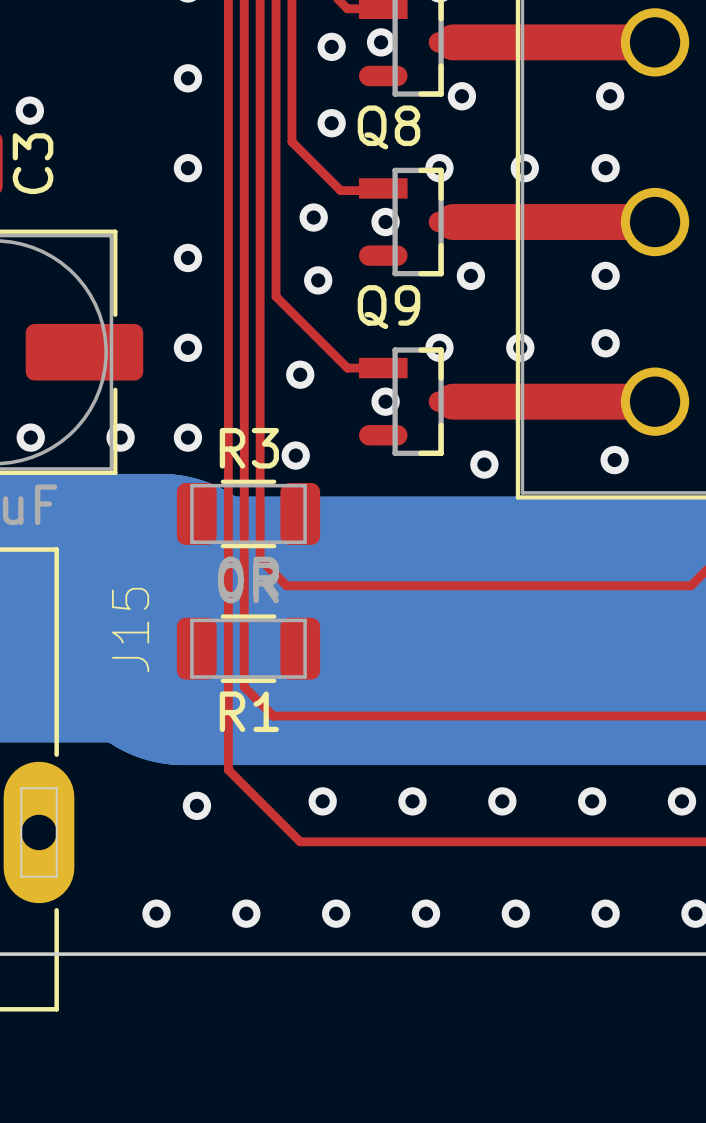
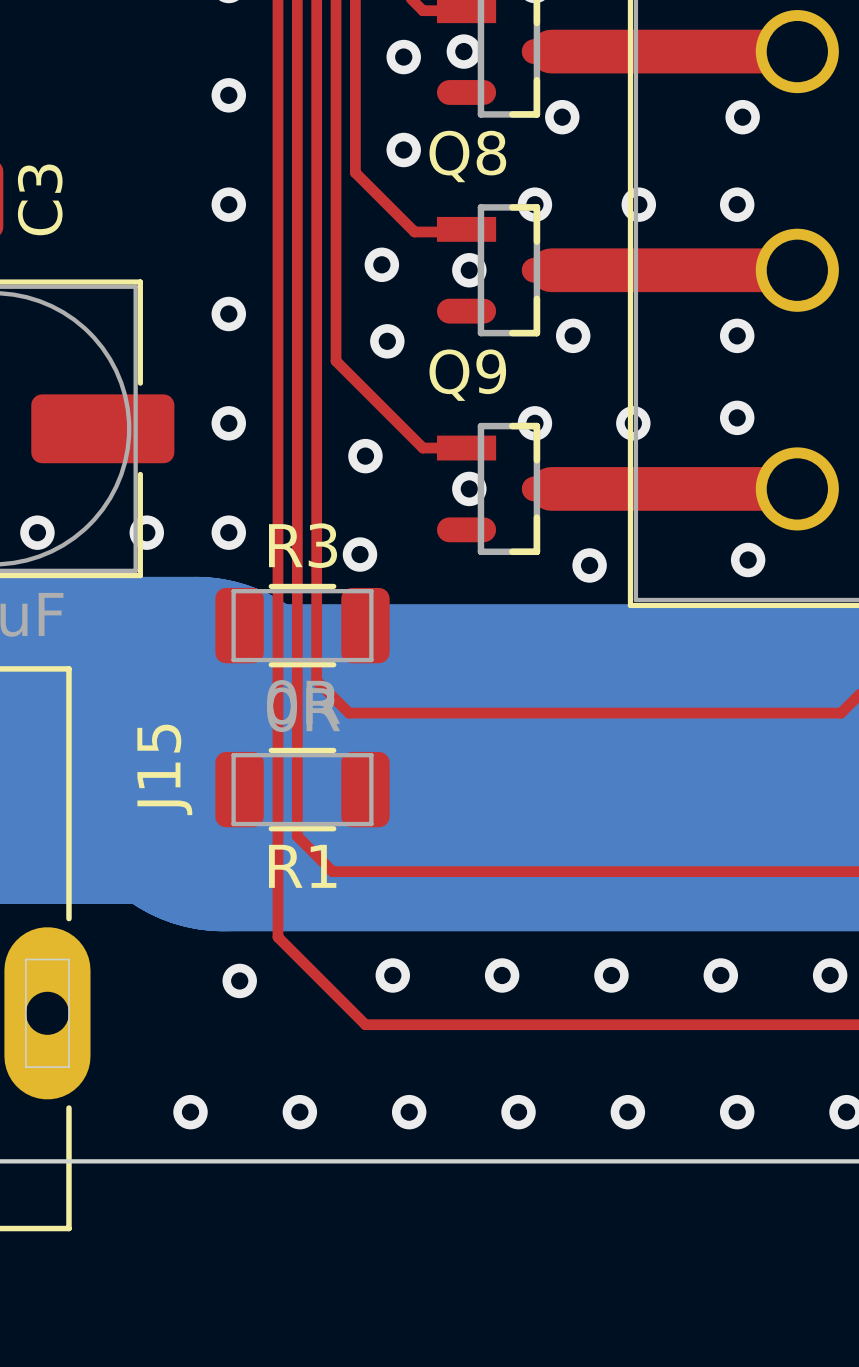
via: (29, 110) -> none

